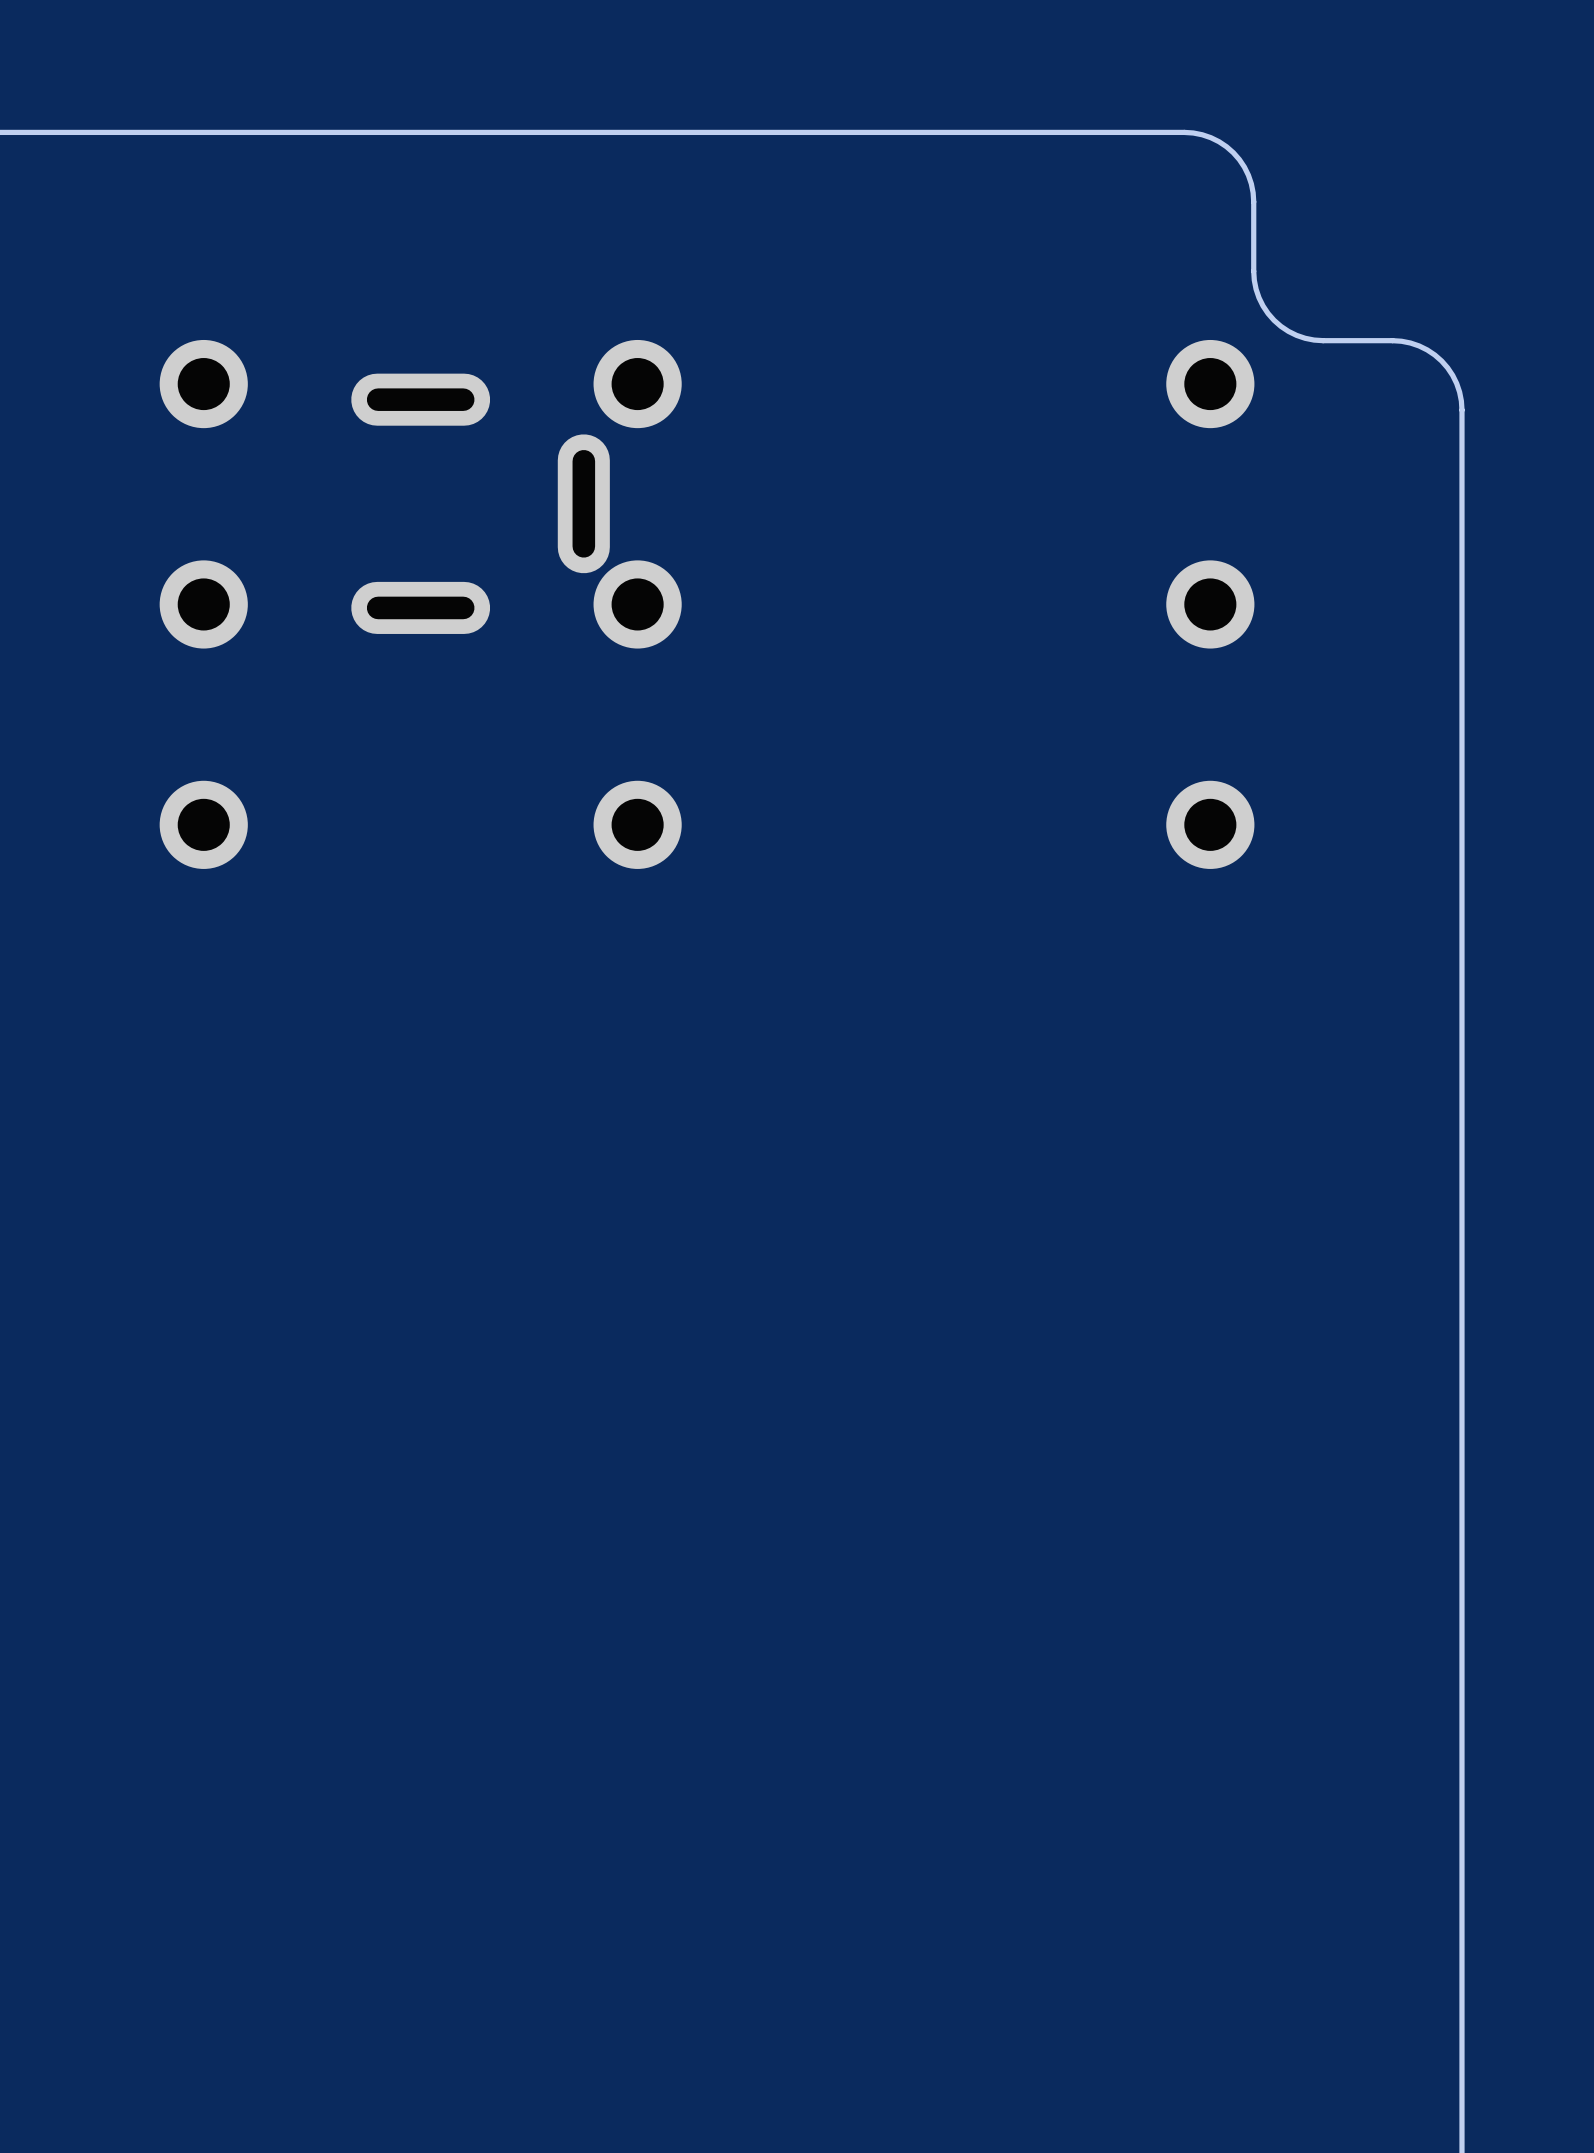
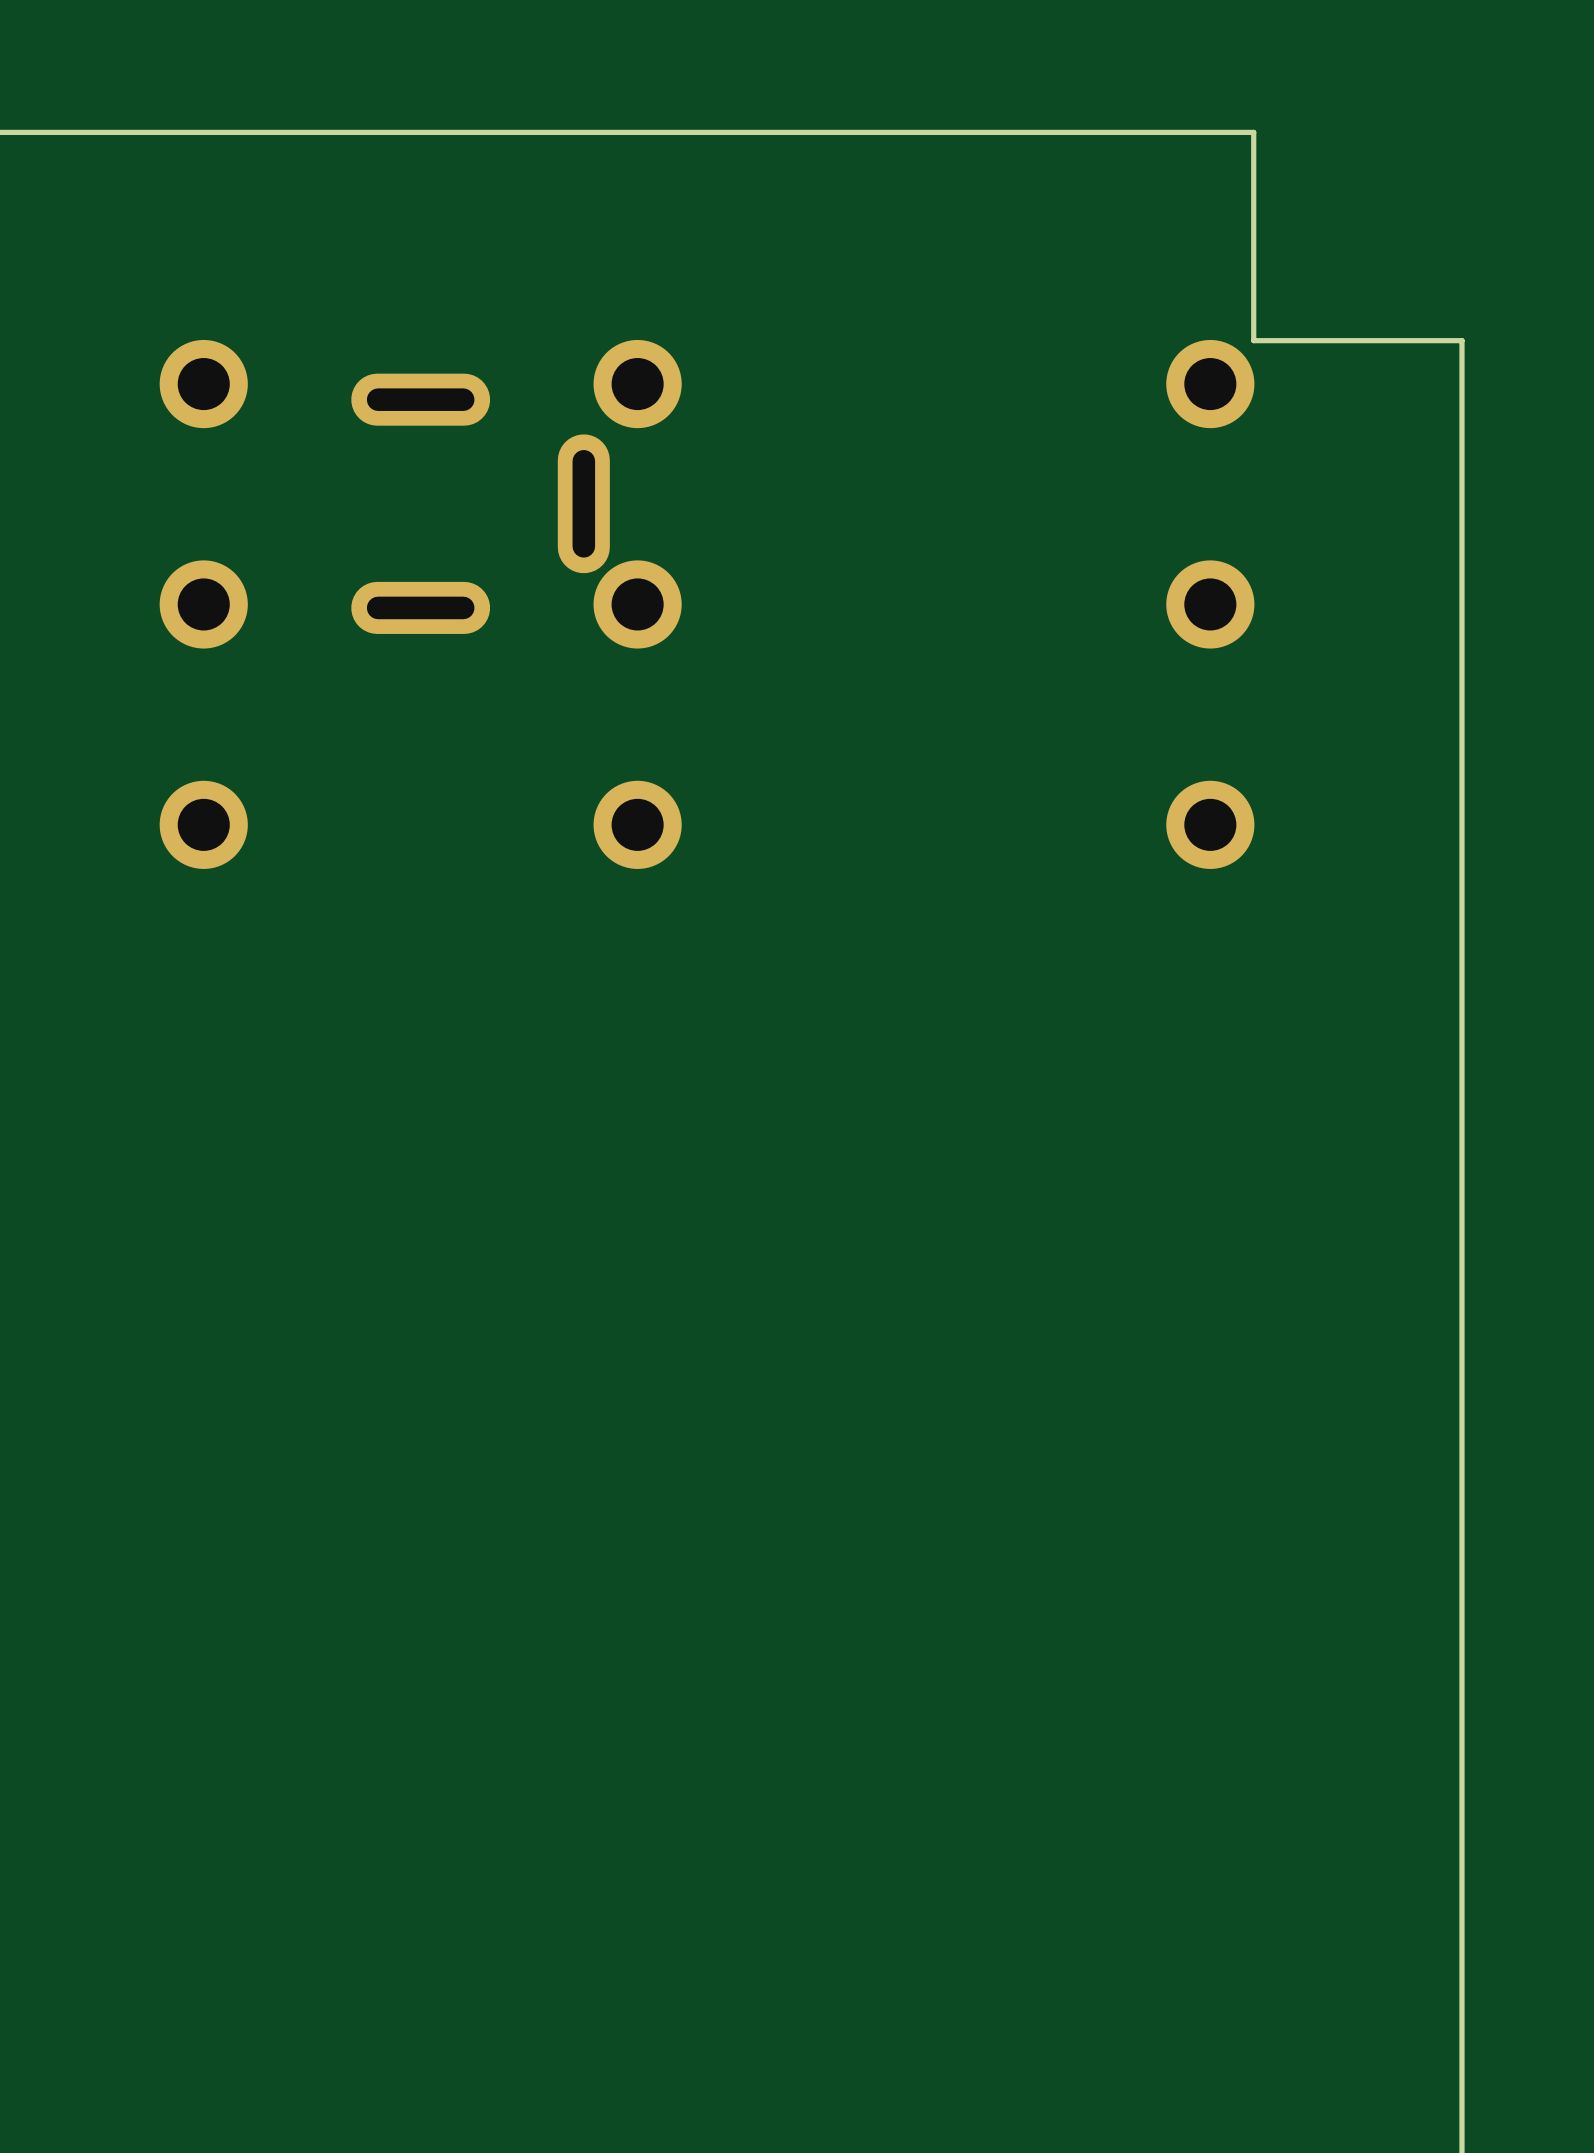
board edge: (1184, 132) (1210, 137) (1233, 152) (1248, 175) (1253, 201) -> (1184, 132) (1253, 132) (1253, 201)
board edge: (1253, 271) (1259, 297) (1274, 320) (1296, 335) (1323, 340) -> (1253, 271) (1253, 340) (1323, 340)
board edge: (1392, 340) (1419, 345) (1441, 361) (1456, 383) (1461, 410) -> (1392, 340) (1461, 340) (1461, 410)

